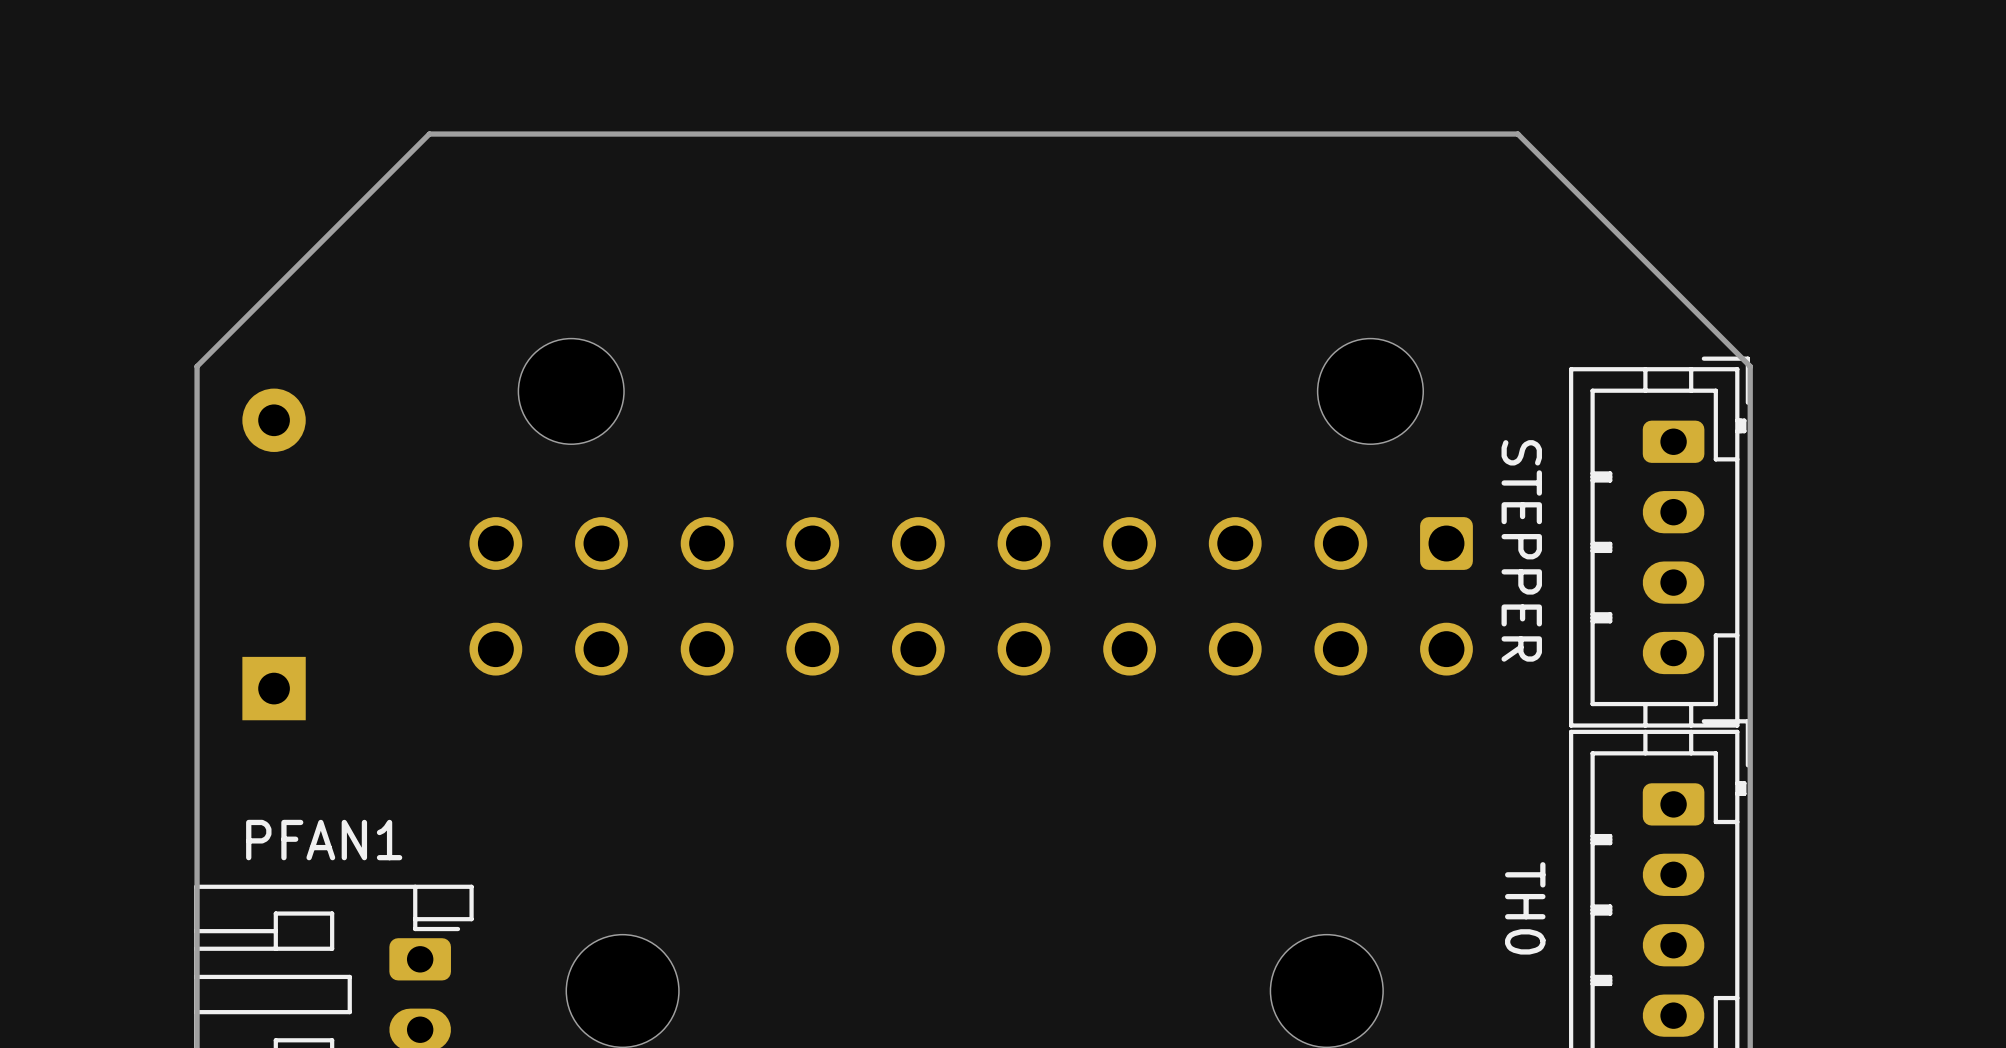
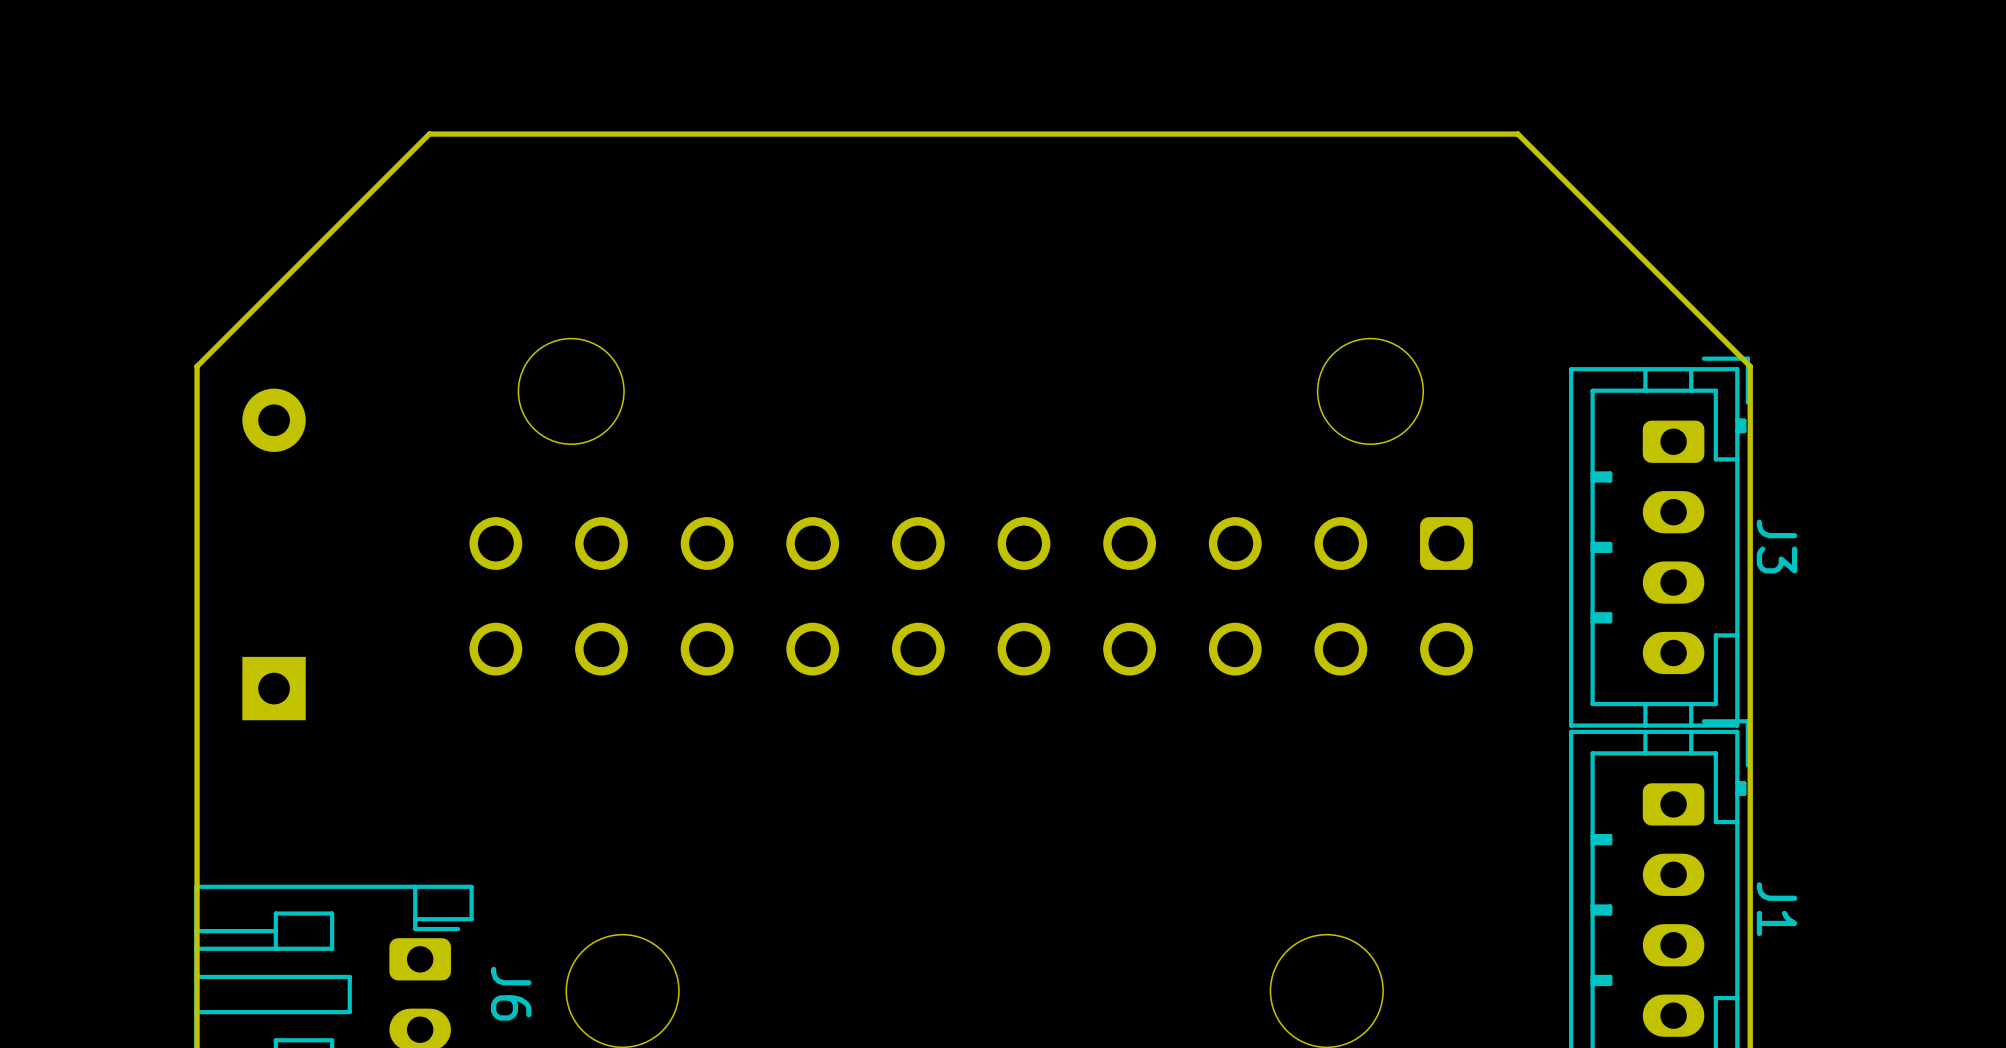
STEPPER name: STEPPER (1521, 550) -> J3 (1777, 546)
PFAN1 name: PFAN1 (324, 840) -> J6 (511, 993)
TH0 name: TH0 (1525, 908) -> J1 (1777, 909)

